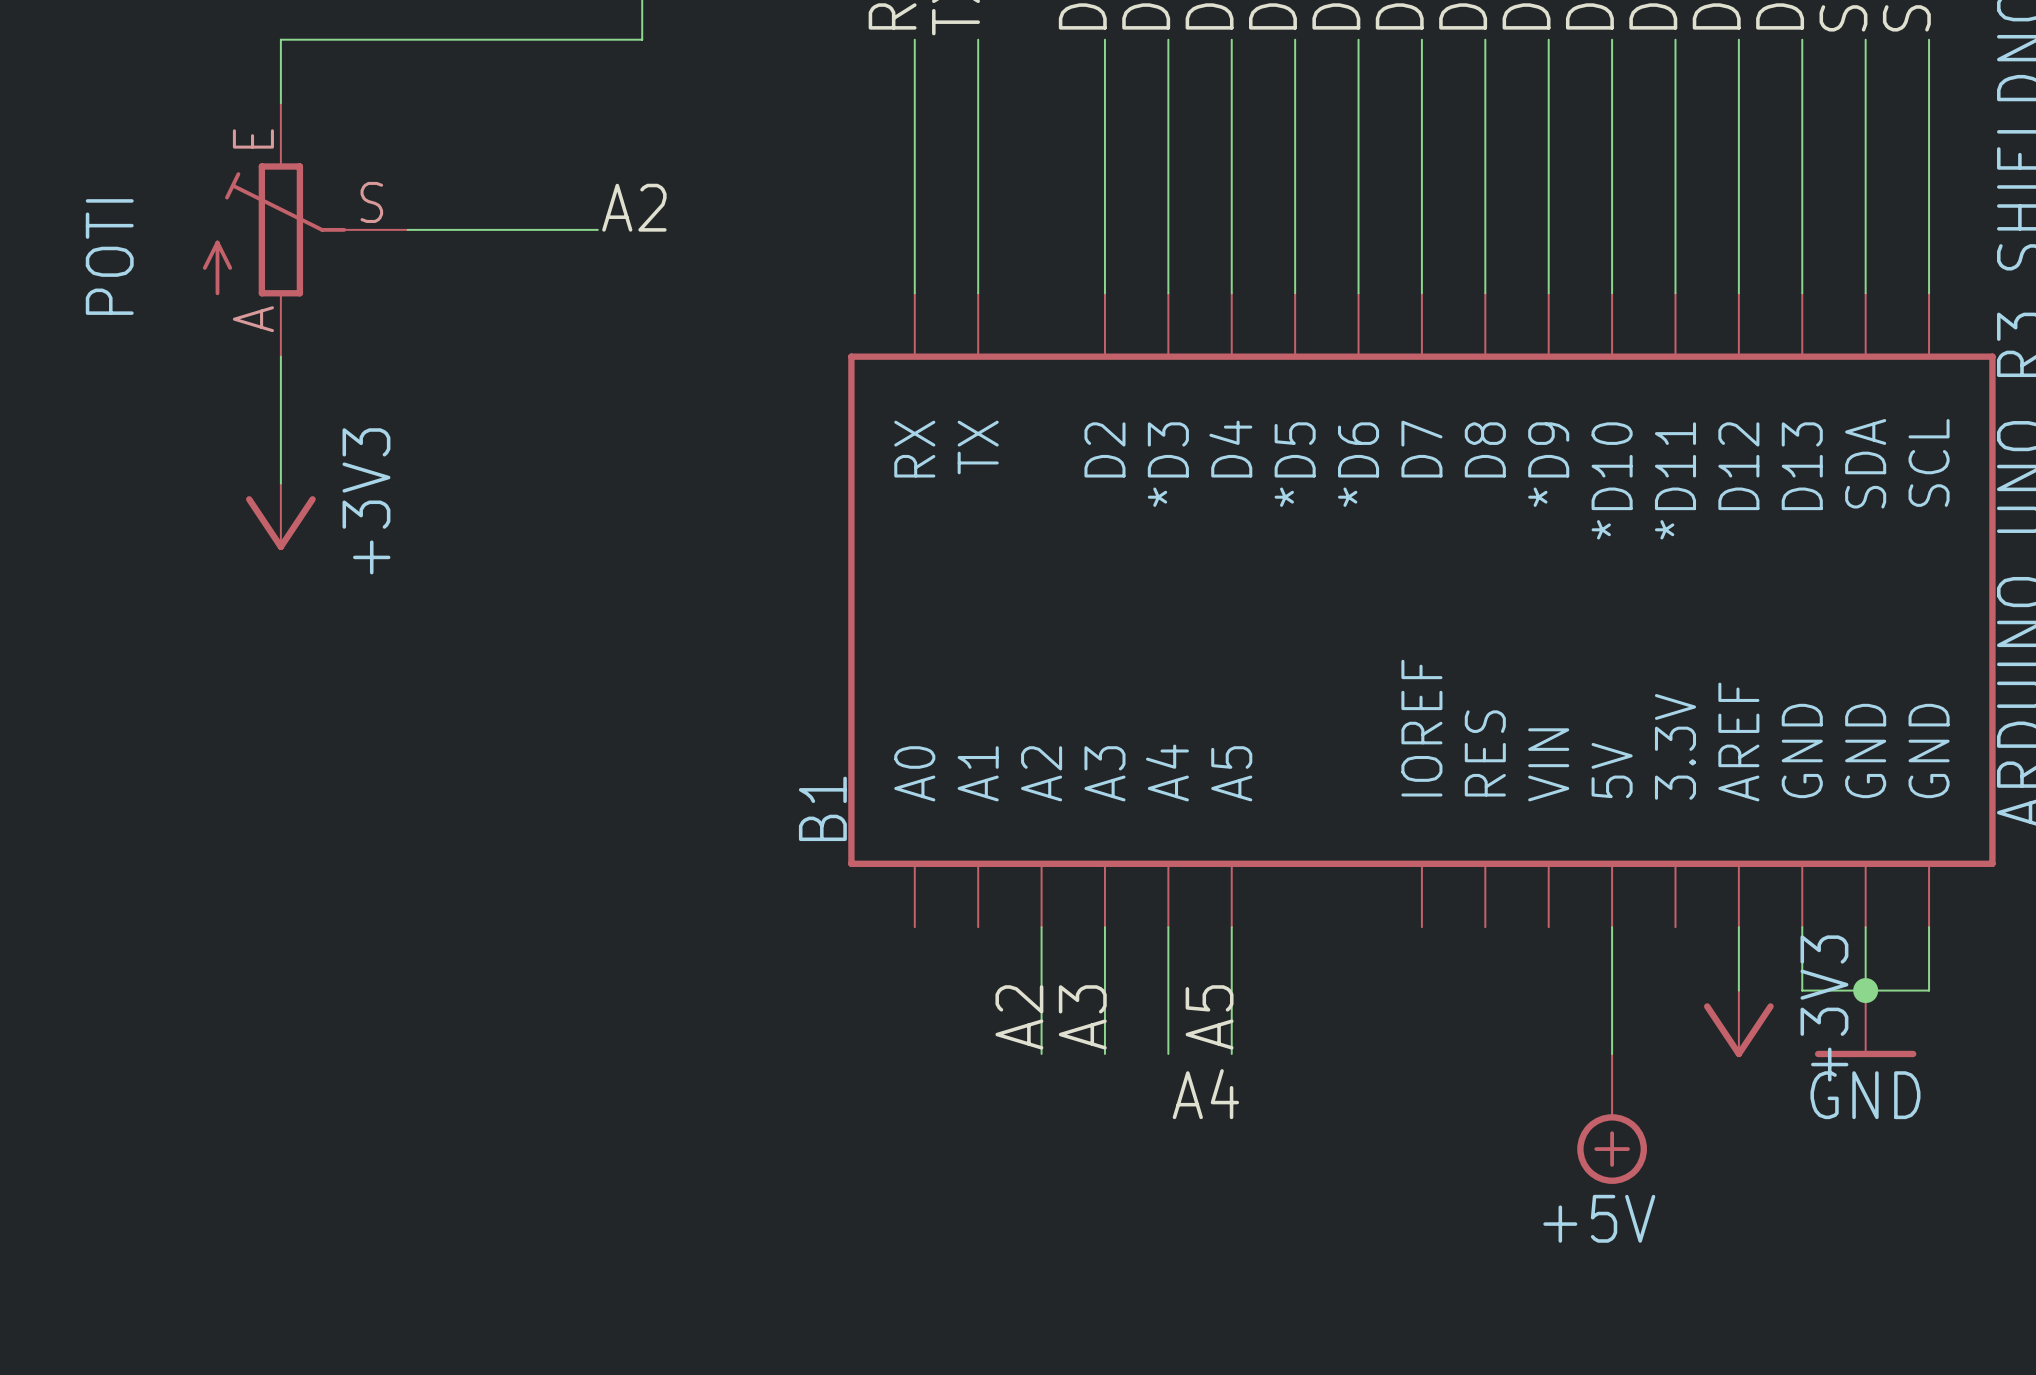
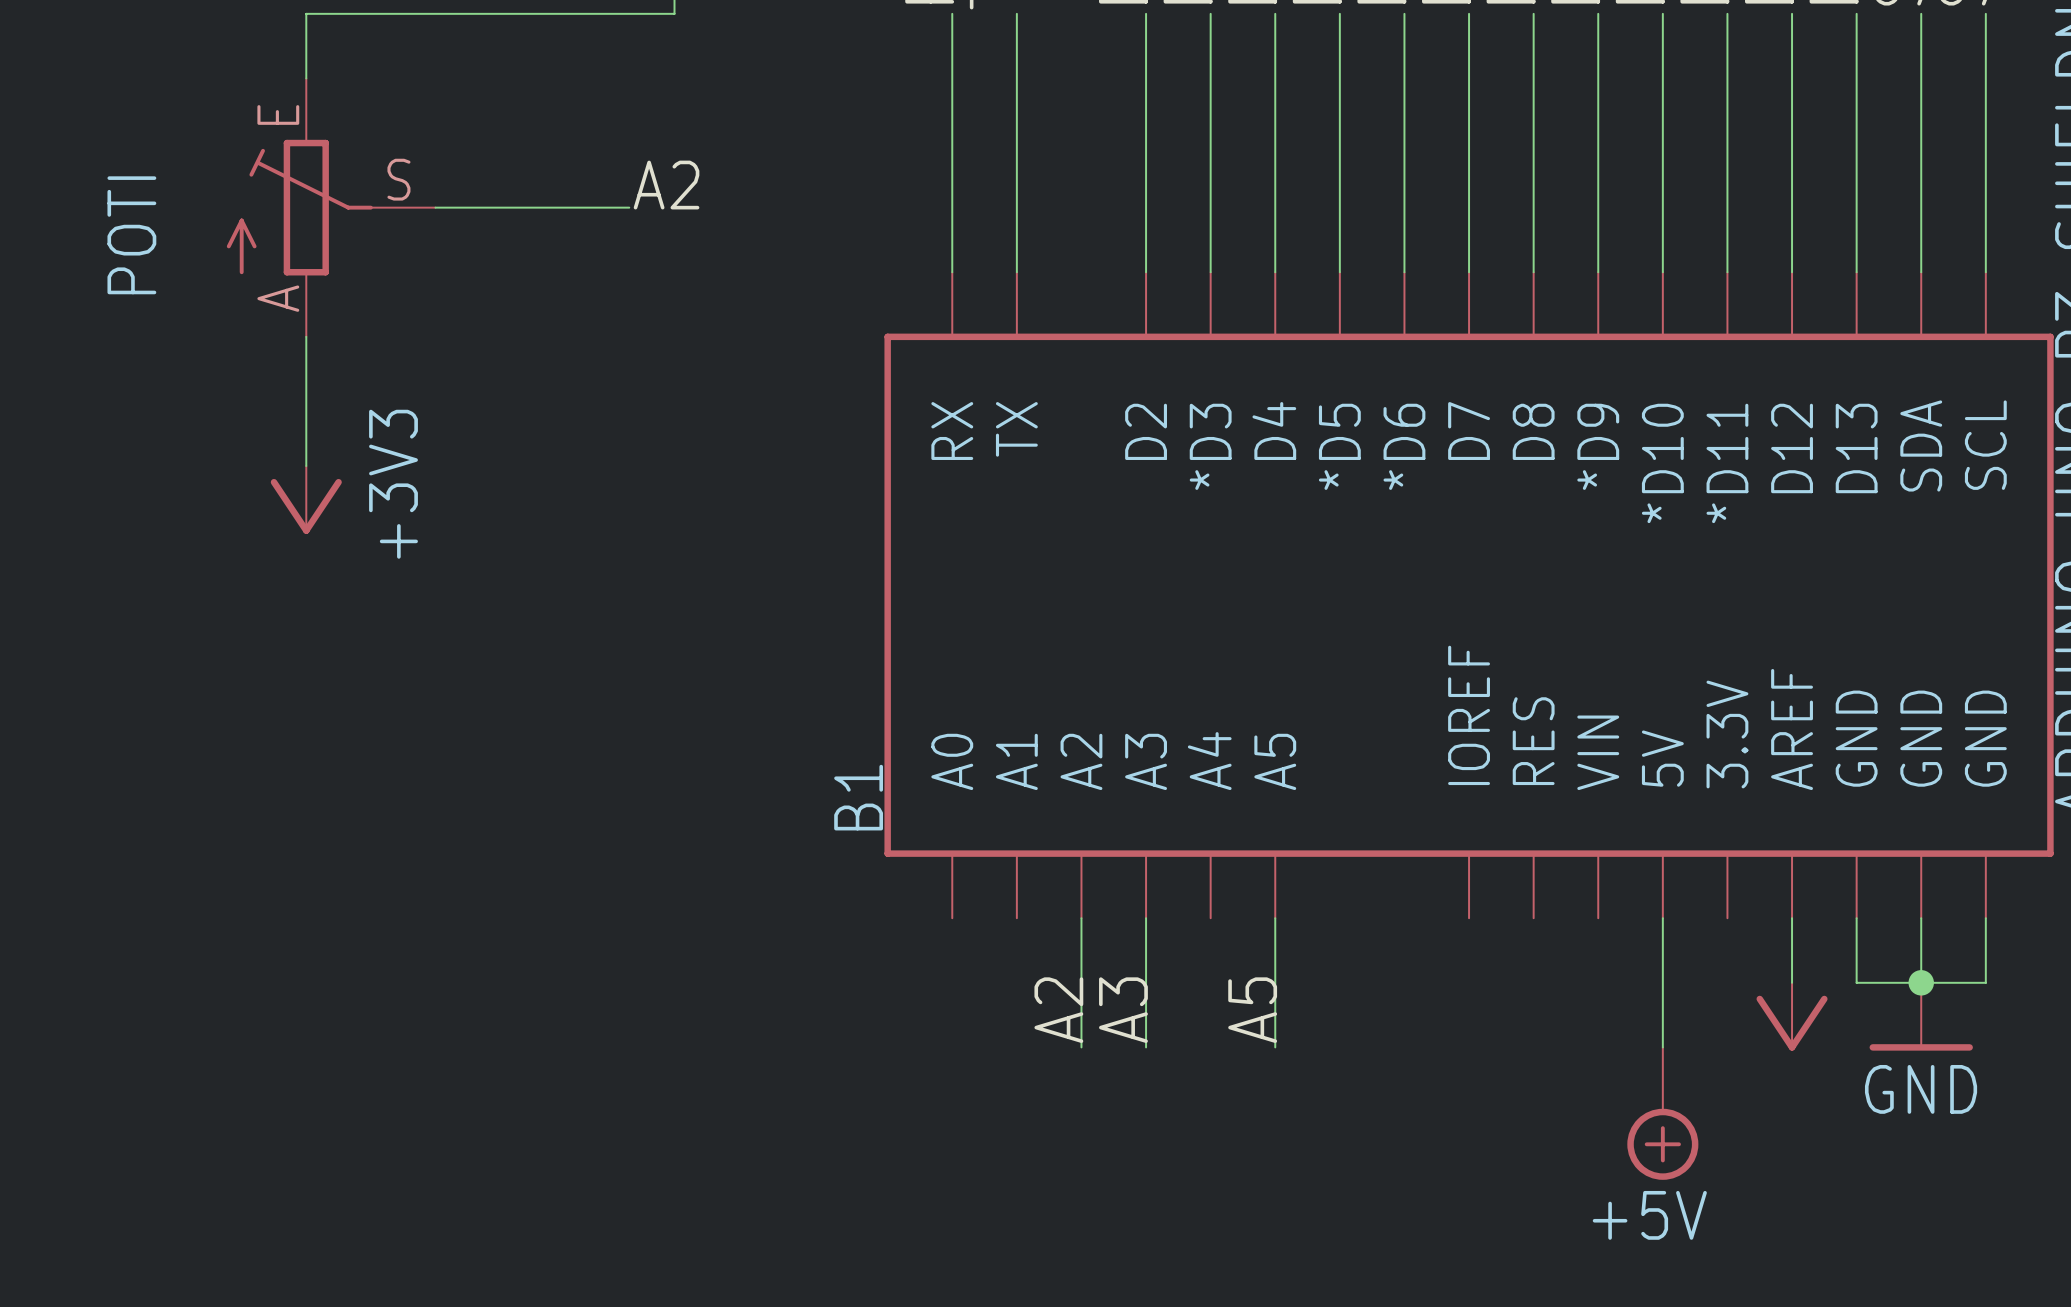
wire: (1168, 927) (1168, 1053) -> none
power symbol text: +3V3 (1824, 1008) -> none
label: A4 (1205, 1094) -> none

